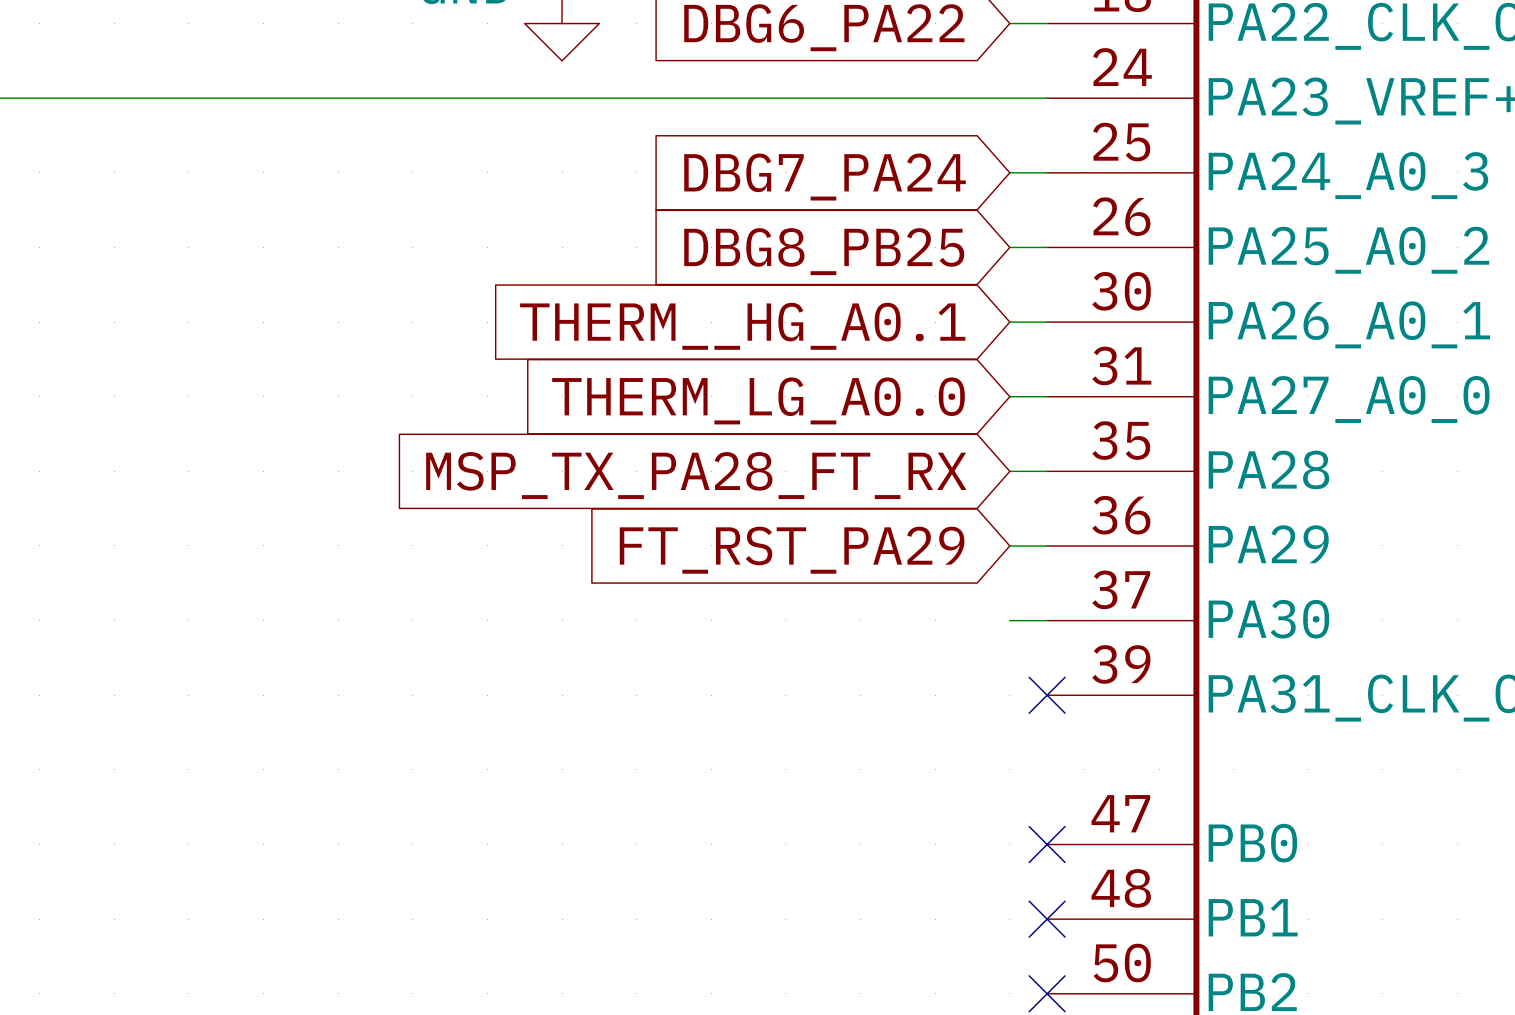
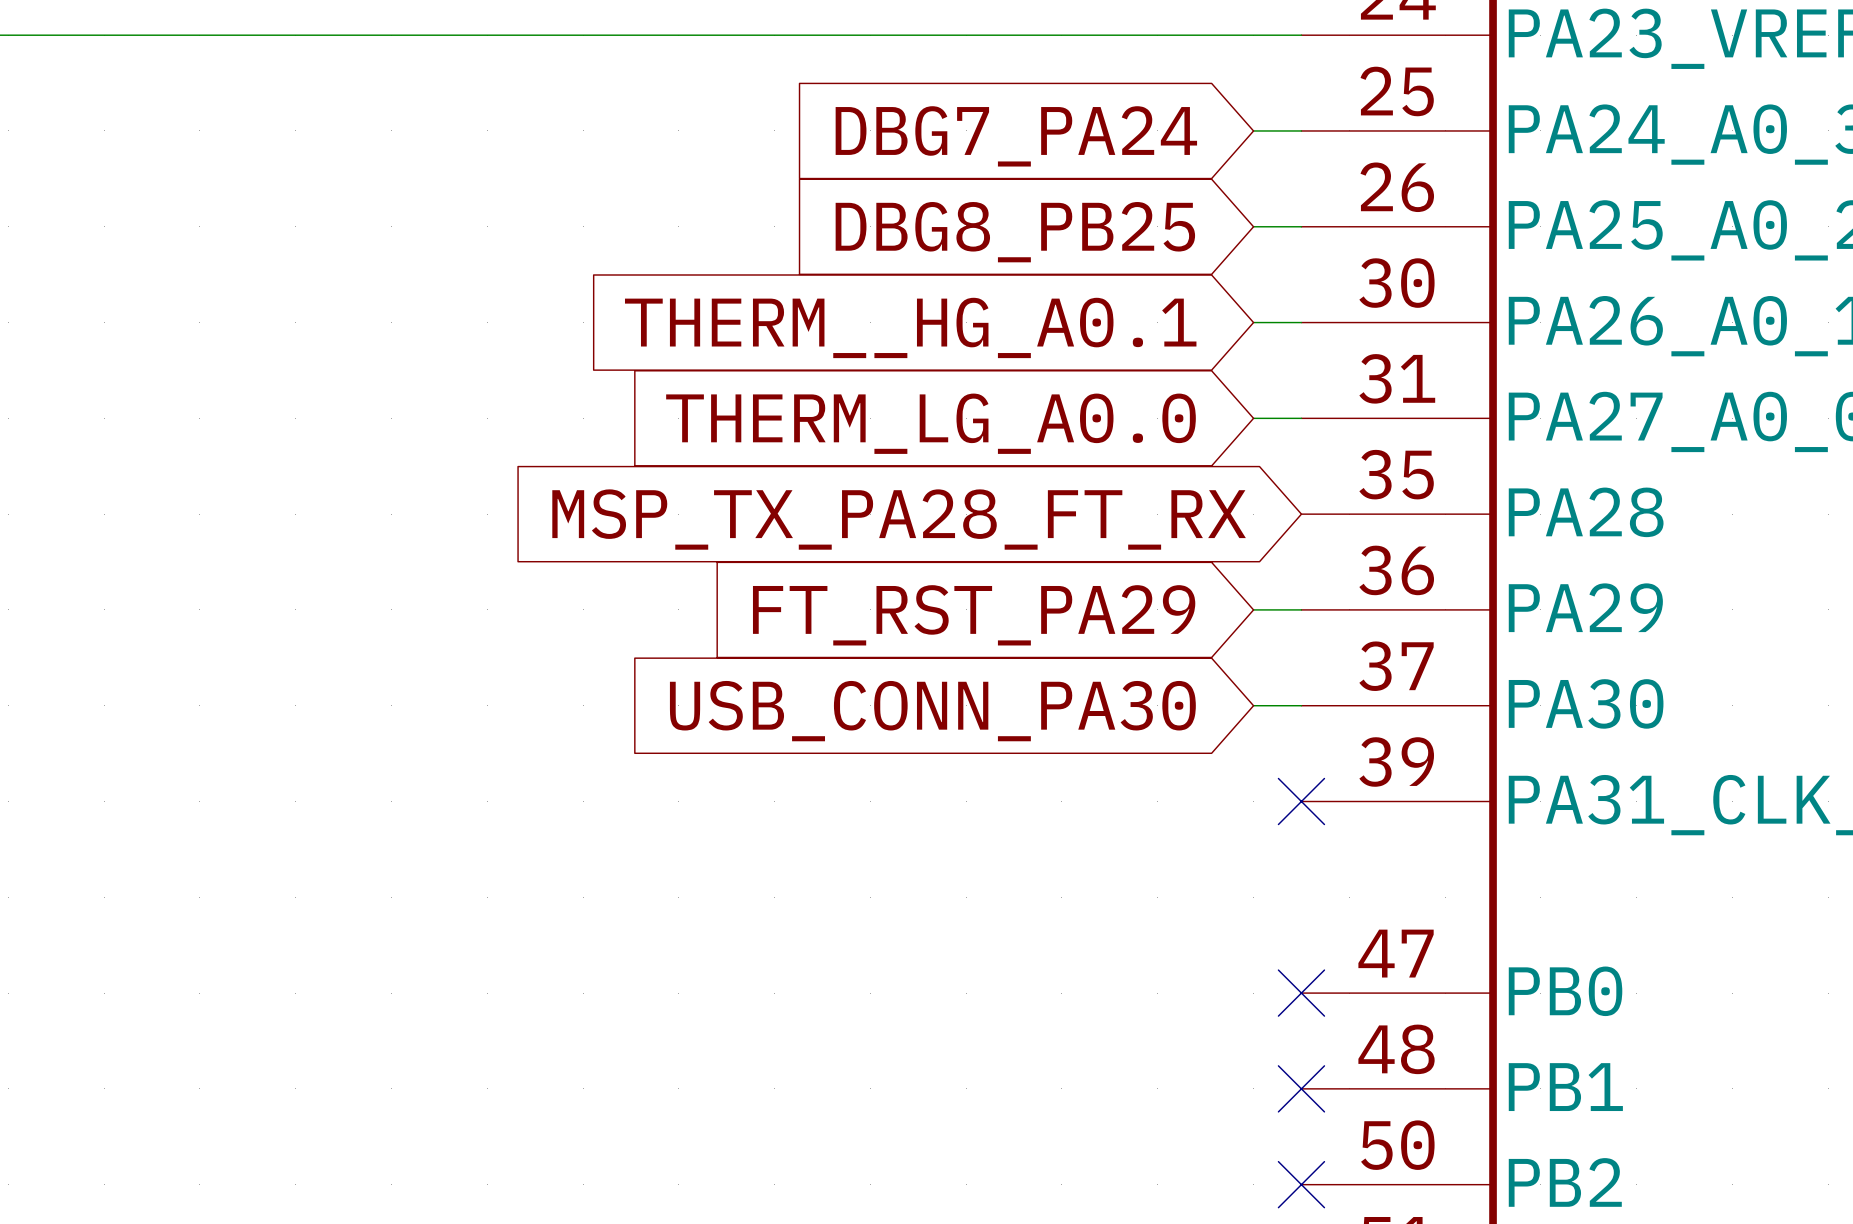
wire: (1009, 471) (1047, 471) -> none
global label position: MSP_TX_PA28_FT_RX (696, 475) -> MSP_TX_PA28_FT_RX (899, 519)
global label: none -> USB_CONN_PA30 (932, 711)

